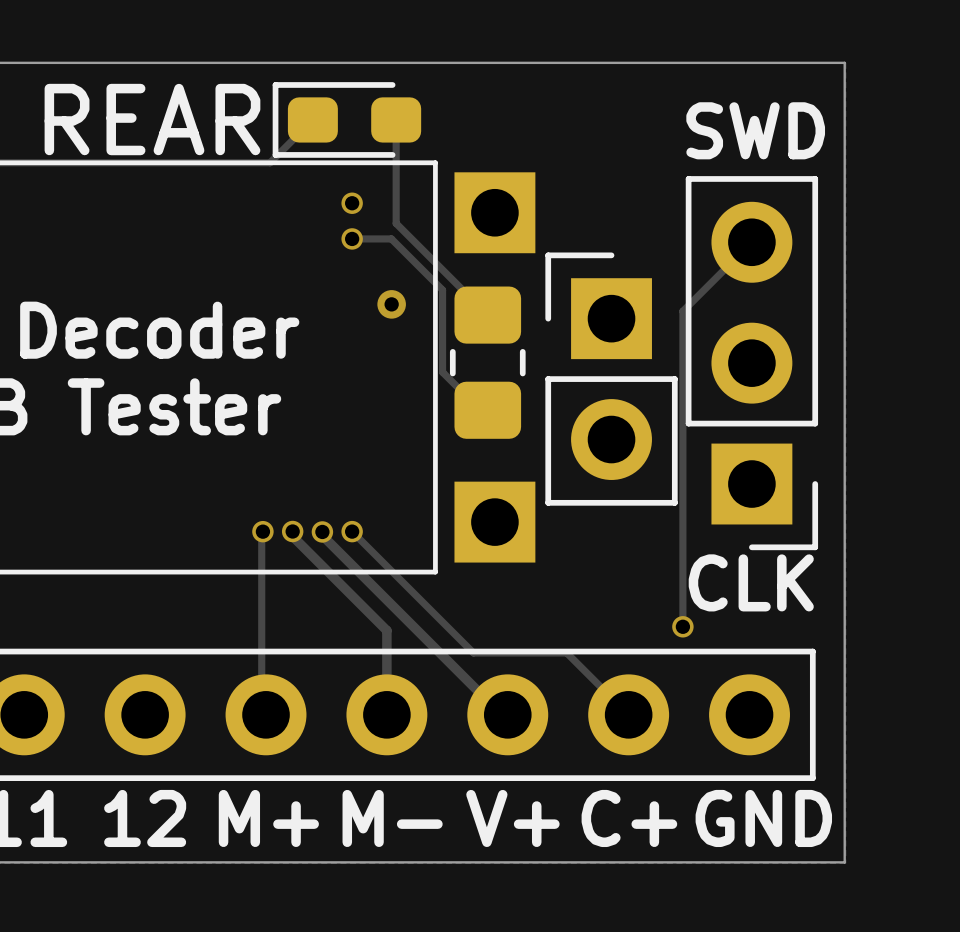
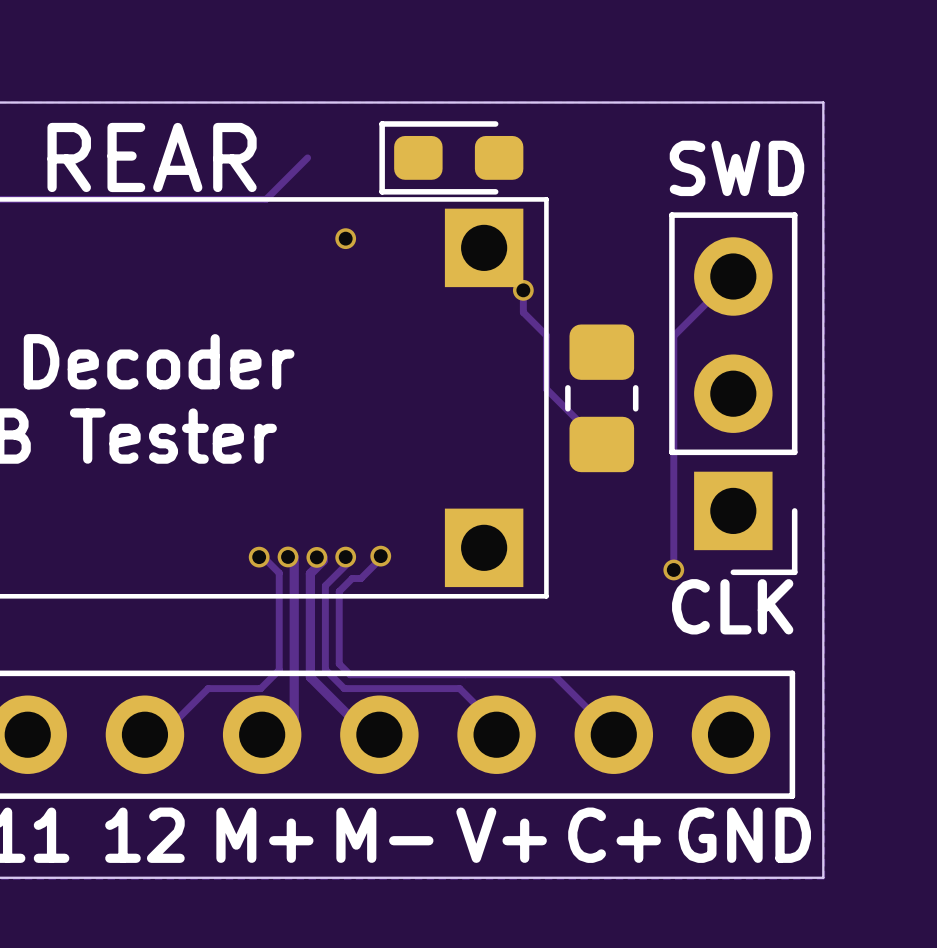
part position: (346, 119) -> (451, 157)
track: (396, 119) (396, 223) (487, 315) -> none
line: (435, 162) (435, 572) -> (426, 199) (546, 199) (546, 596) (426, 596)
track: (352, 238) (391, 238) (442, 290) (442, 372) (480, 410) (487, 410) -> none
via: (352, 238) -> none
part footprint: [545, 252, 678, 506] -> [565, 324, 639, 473]
track: none -> (523, 290) (523, 312) (546, 335) (546, 389) (601, 444)
via: none -> (523, 290)
track: (690, 303) (682, 311) (682, 626) -> (673, 336) (673, 569)
via: (391, 304) -> none
part: (487, 362) -> none
via: none -> (380, 556)
track: (262, 531) (261, 719) (255, 725) -> none
track: none -> (265, 557) (279, 573) (279, 670) (260, 688) (208, 688) (158, 738)
track: (292, 531) (292, 536) (386, 630) (386, 714) -> none
track: none -> (294, 557) (294, 719) (275, 738)
track: (322, 531) (322, 535) (501, 714) (507, 714) -> none
track: none -> (323, 557) (323, 560) (310, 573) (310, 677) (371, 738) (392, 738)
track: (352, 531) (473, 652) -> (380, 556) (380, 558) (360, 578) (352, 578) (339, 591) (339, 663) (350, 674) (463, 674)
track: none -> (351, 556) (351, 559) (325, 585) (325, 669) (344, 688) (459, 688) (509, 738)
via position: (682, 626) -> (673, 569)

